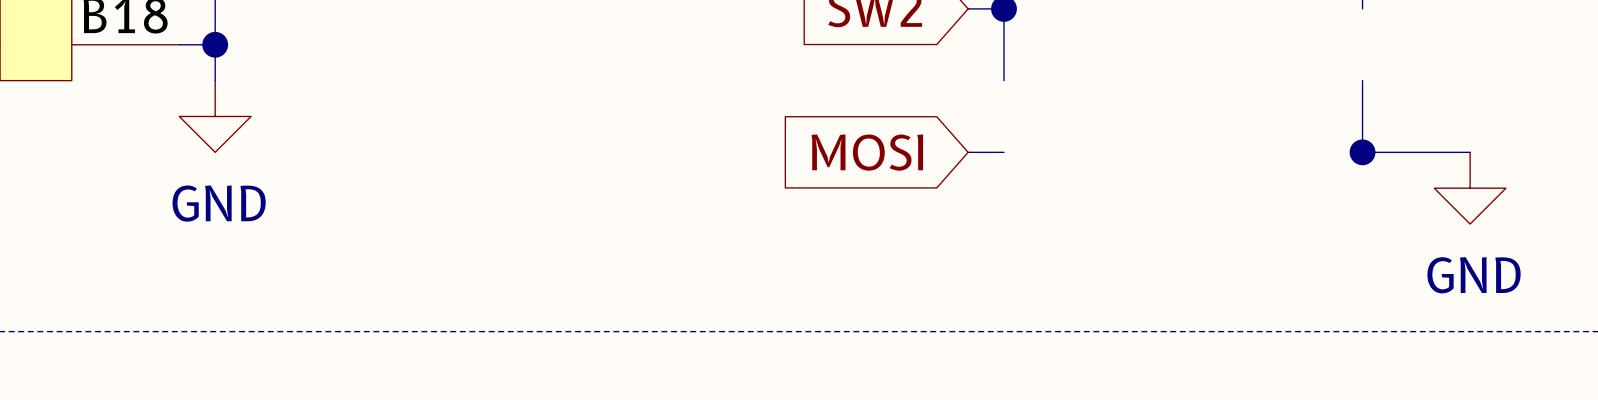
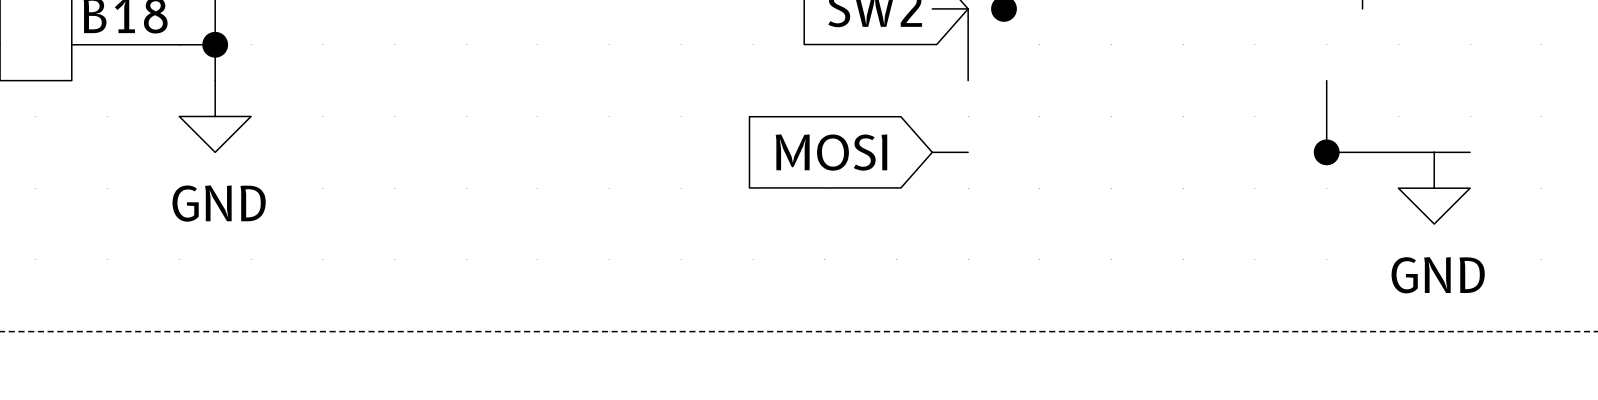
wire: (968, 8) (1003, 8) (1003, 80) -> (932, 8) (968, 8) (968, 80)
wire: (1362, 80) (1362, 152) -> (1326, 80) (1326, 152) (1362, 152)
global label position: MOSI (867, 152) -> MOSI (831, 152)
wire: (968, 152) (1003, 152) -> (968, 152) (932, 152)
junction position: (1362, 152) -> (1326, 152)
power symbol position: GND (1470, 188) -> GND (1434, 188)

